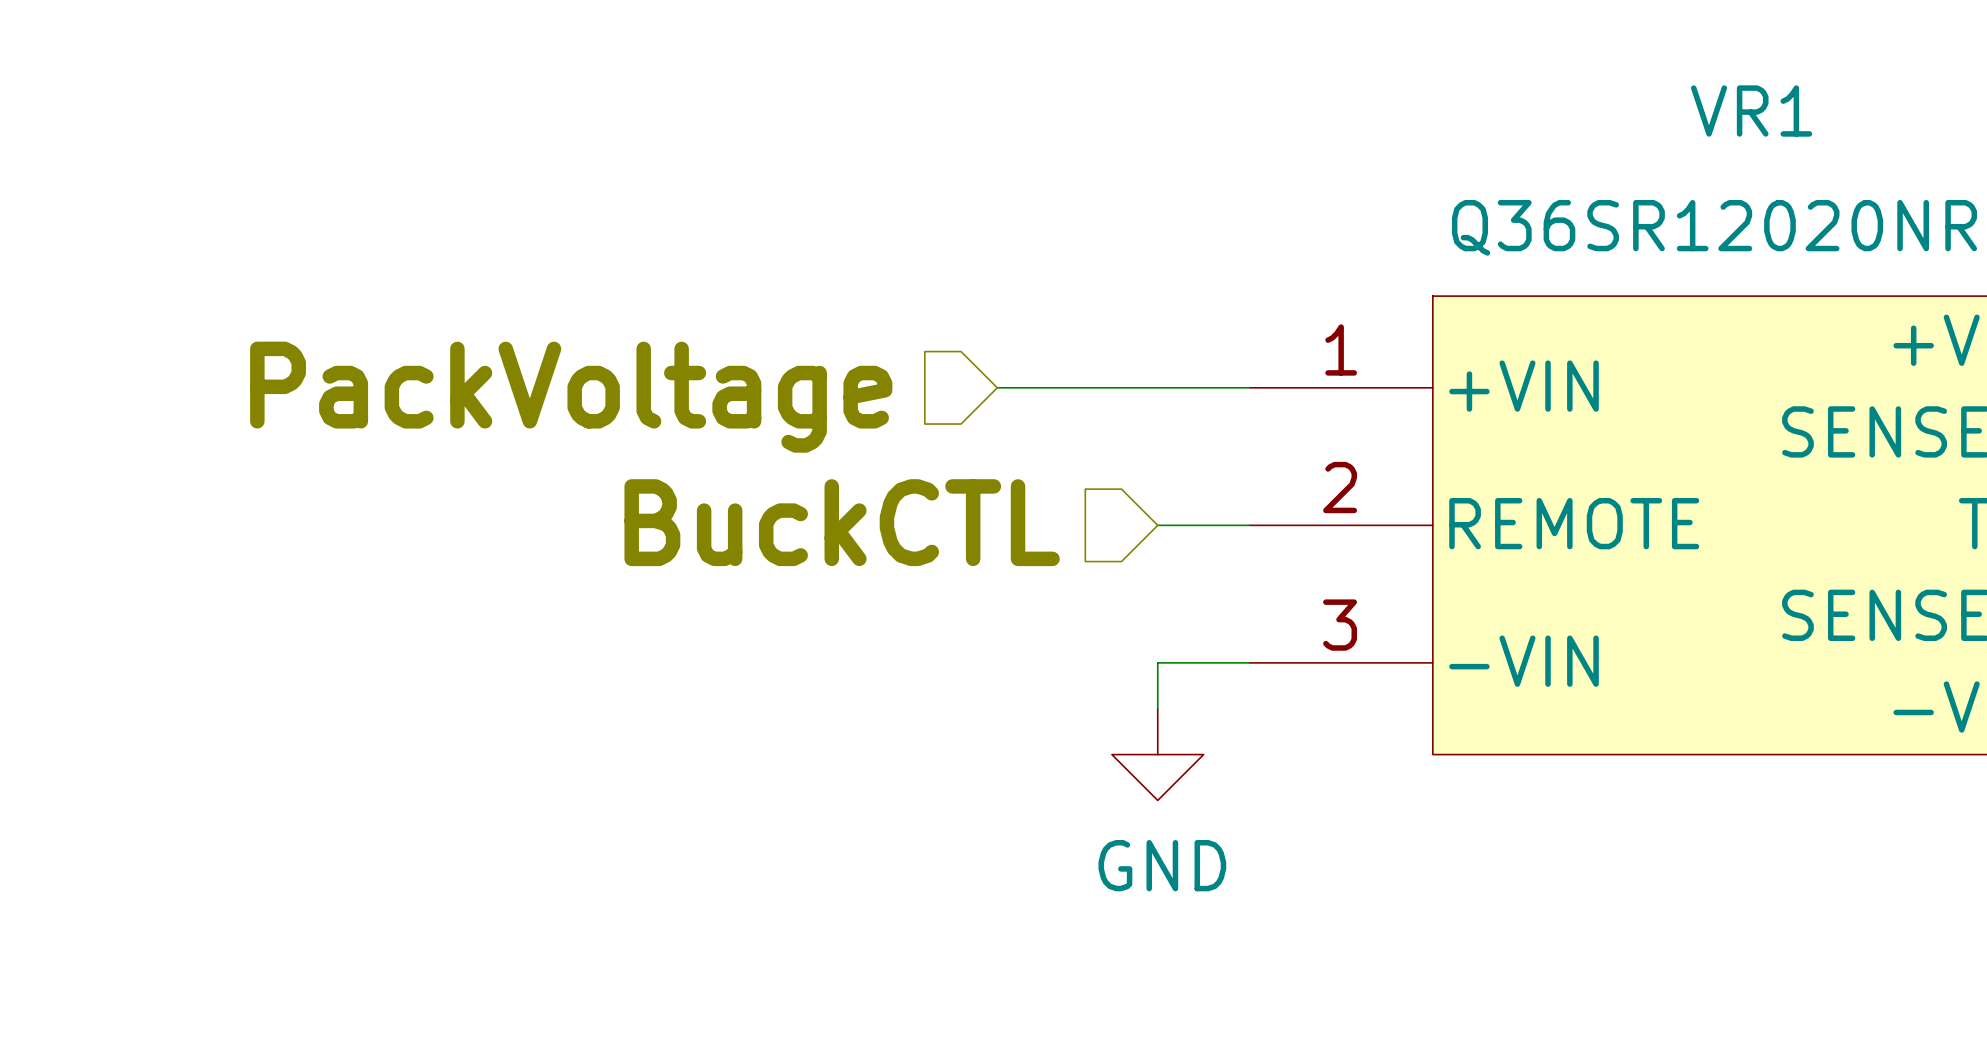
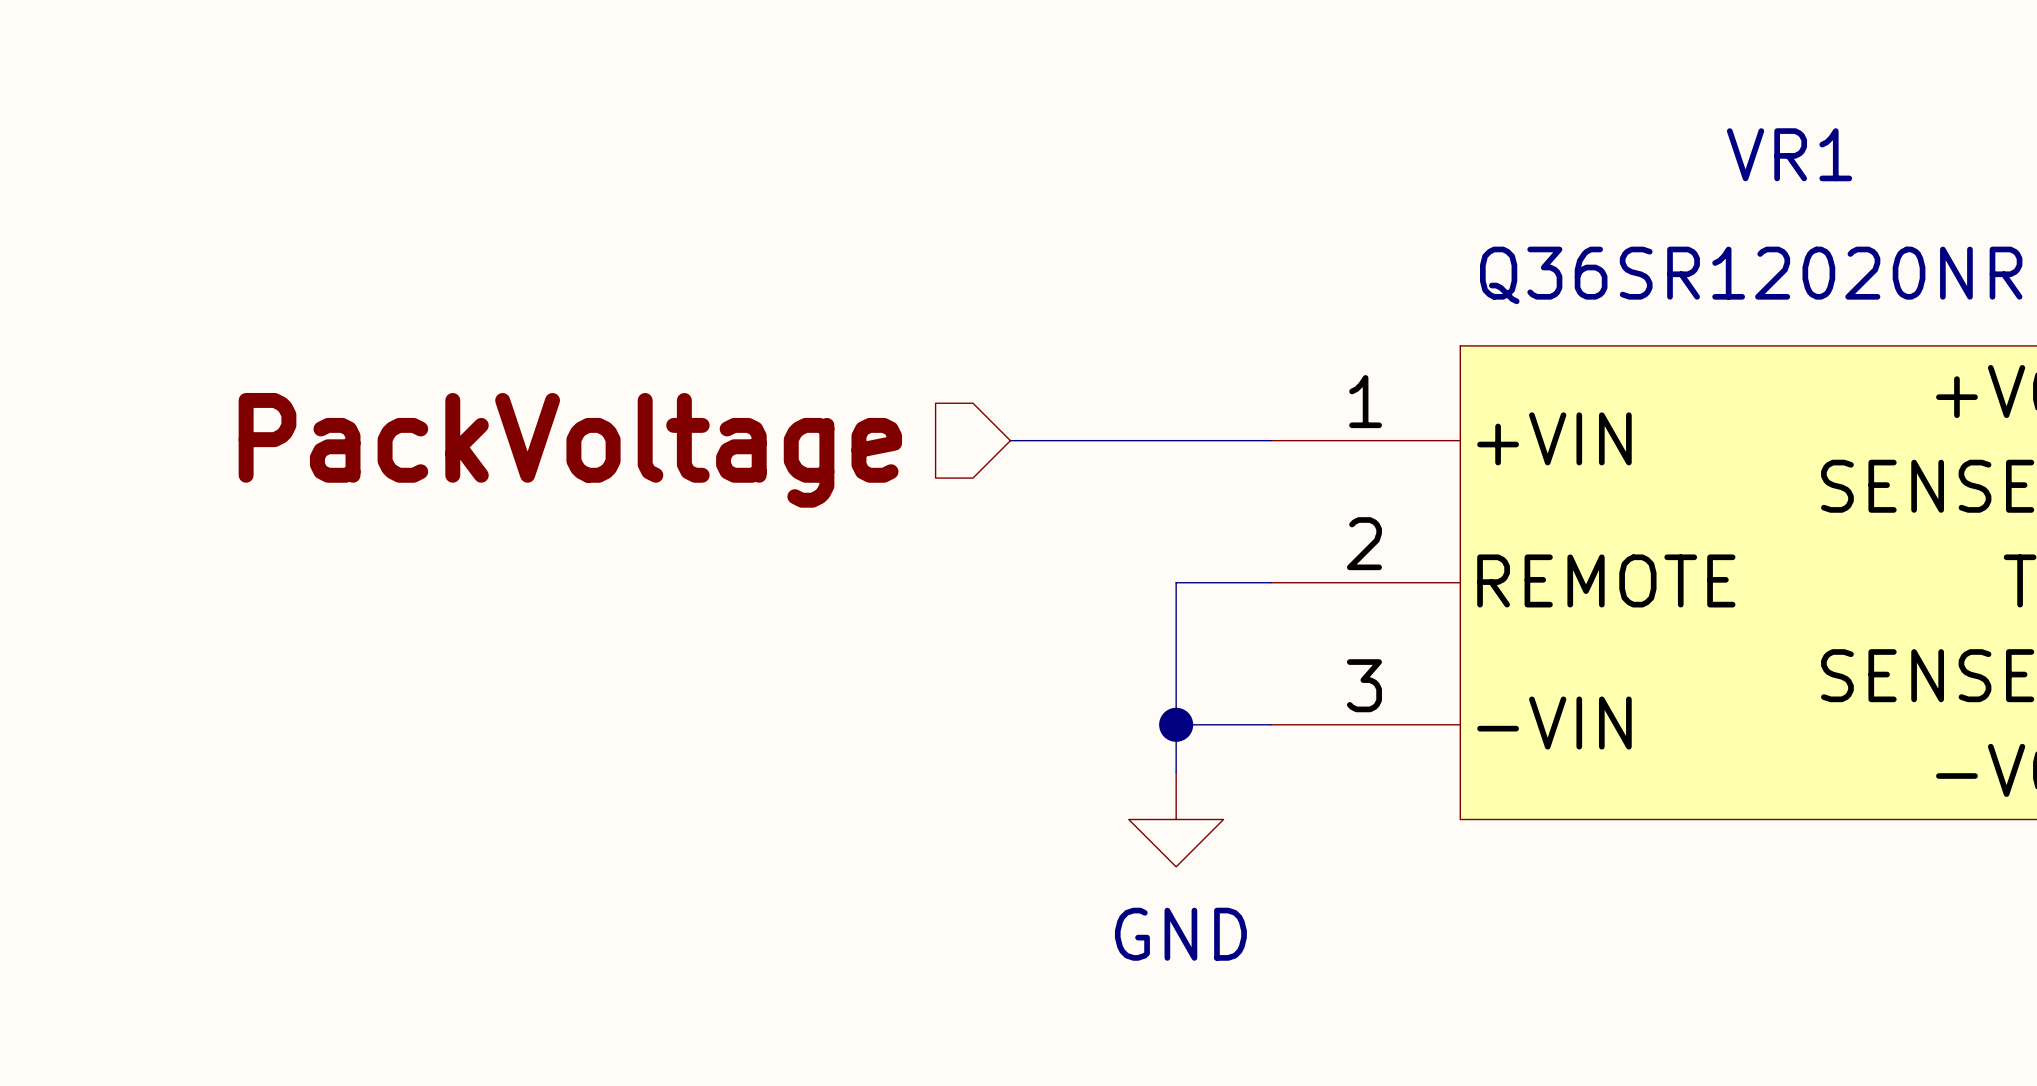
hierarchical label: BuckCTL (842, 522) -> none
wire: none -> (1176, 582) (1176, 724)
junction: none -> (1176, 724)

